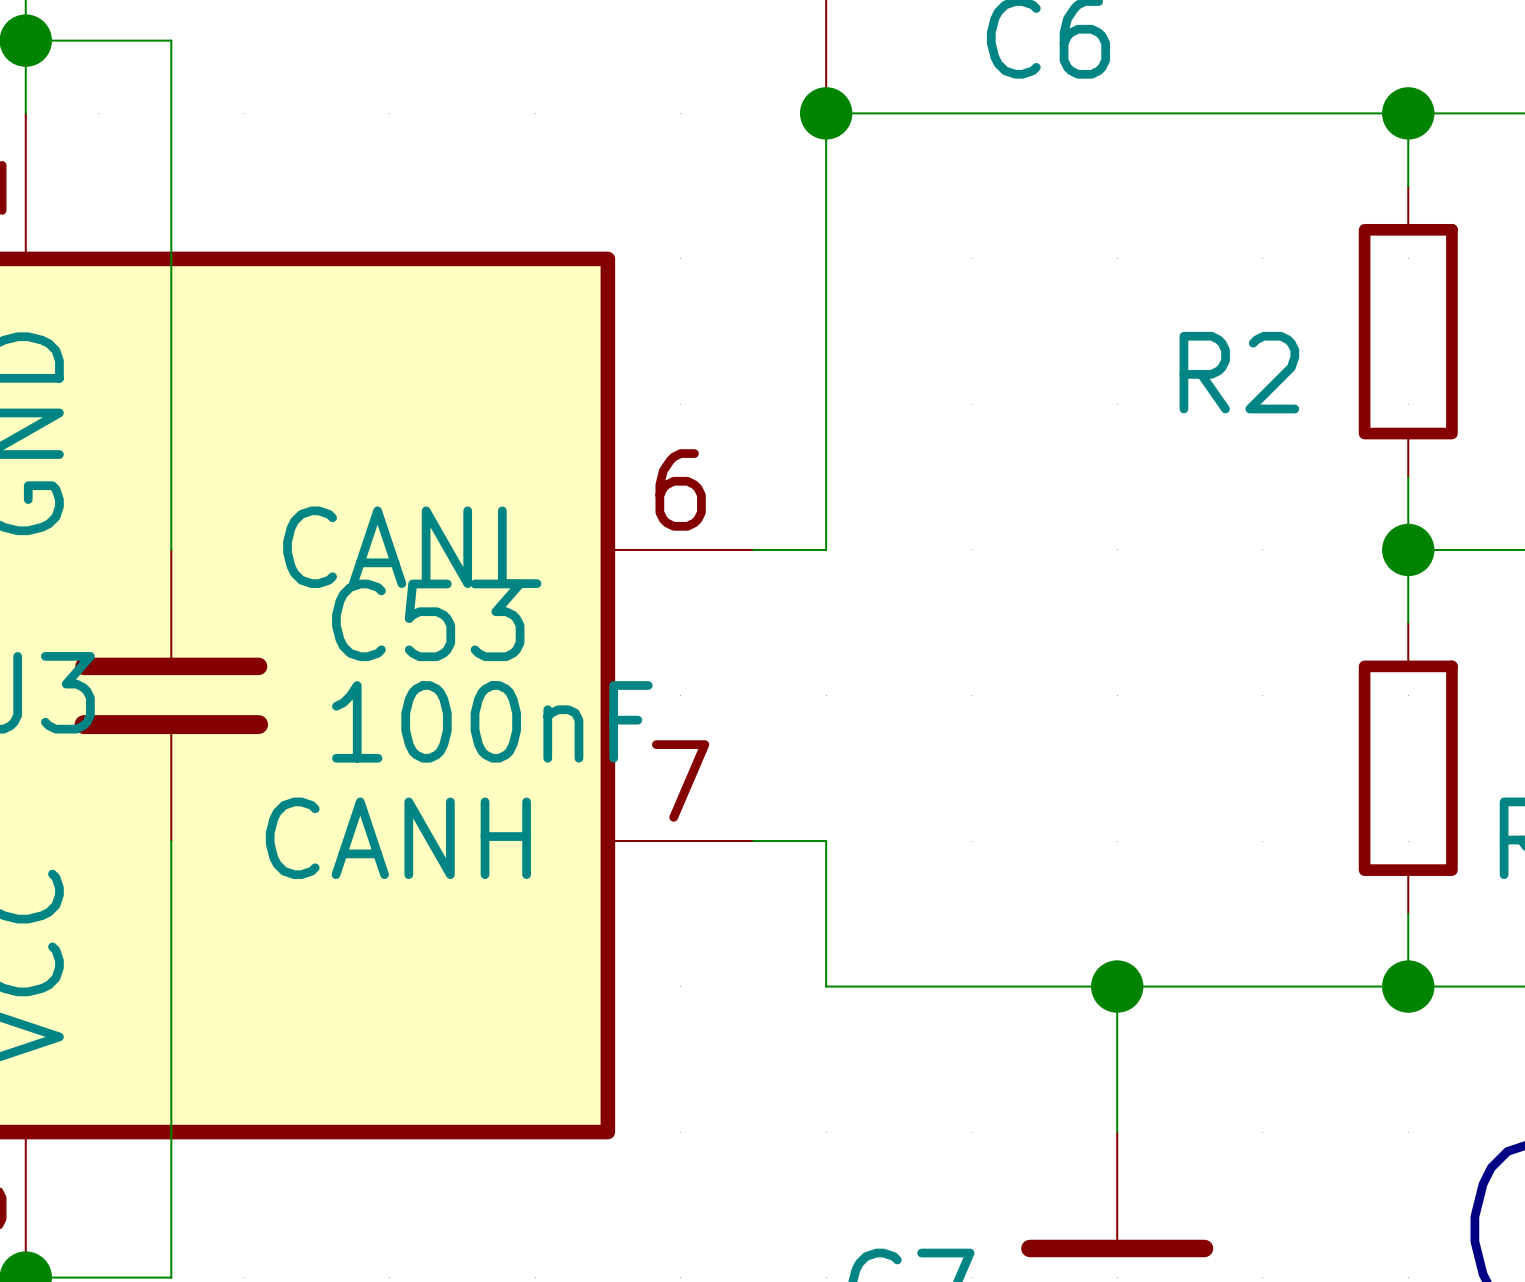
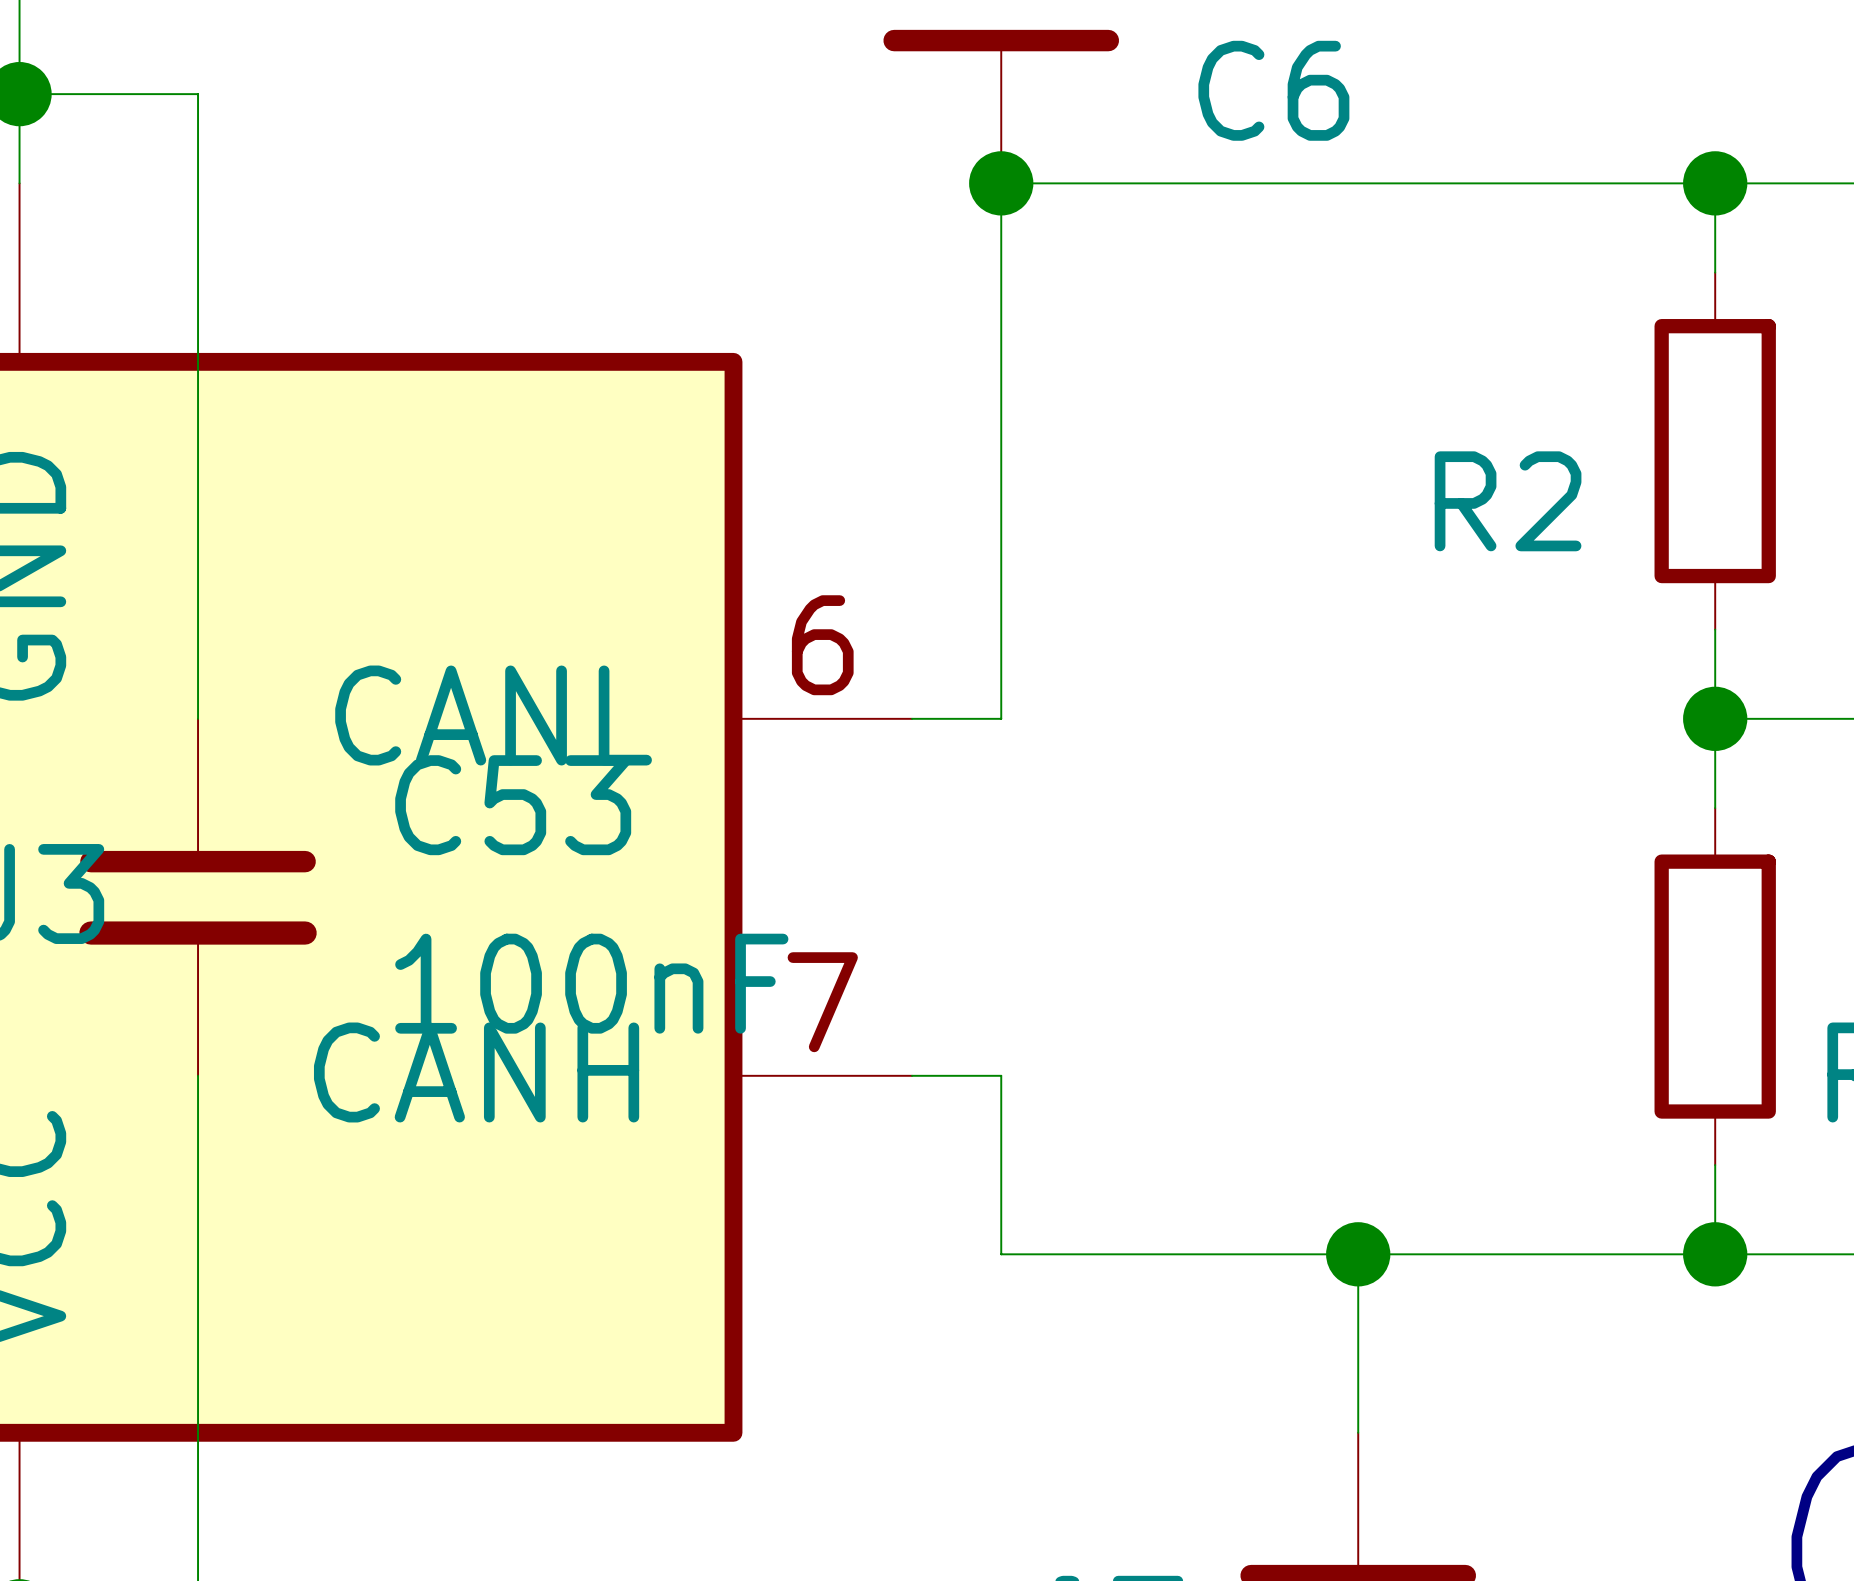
C53 value position: 100nF (492, 721) -> 100nF (591, 983)

